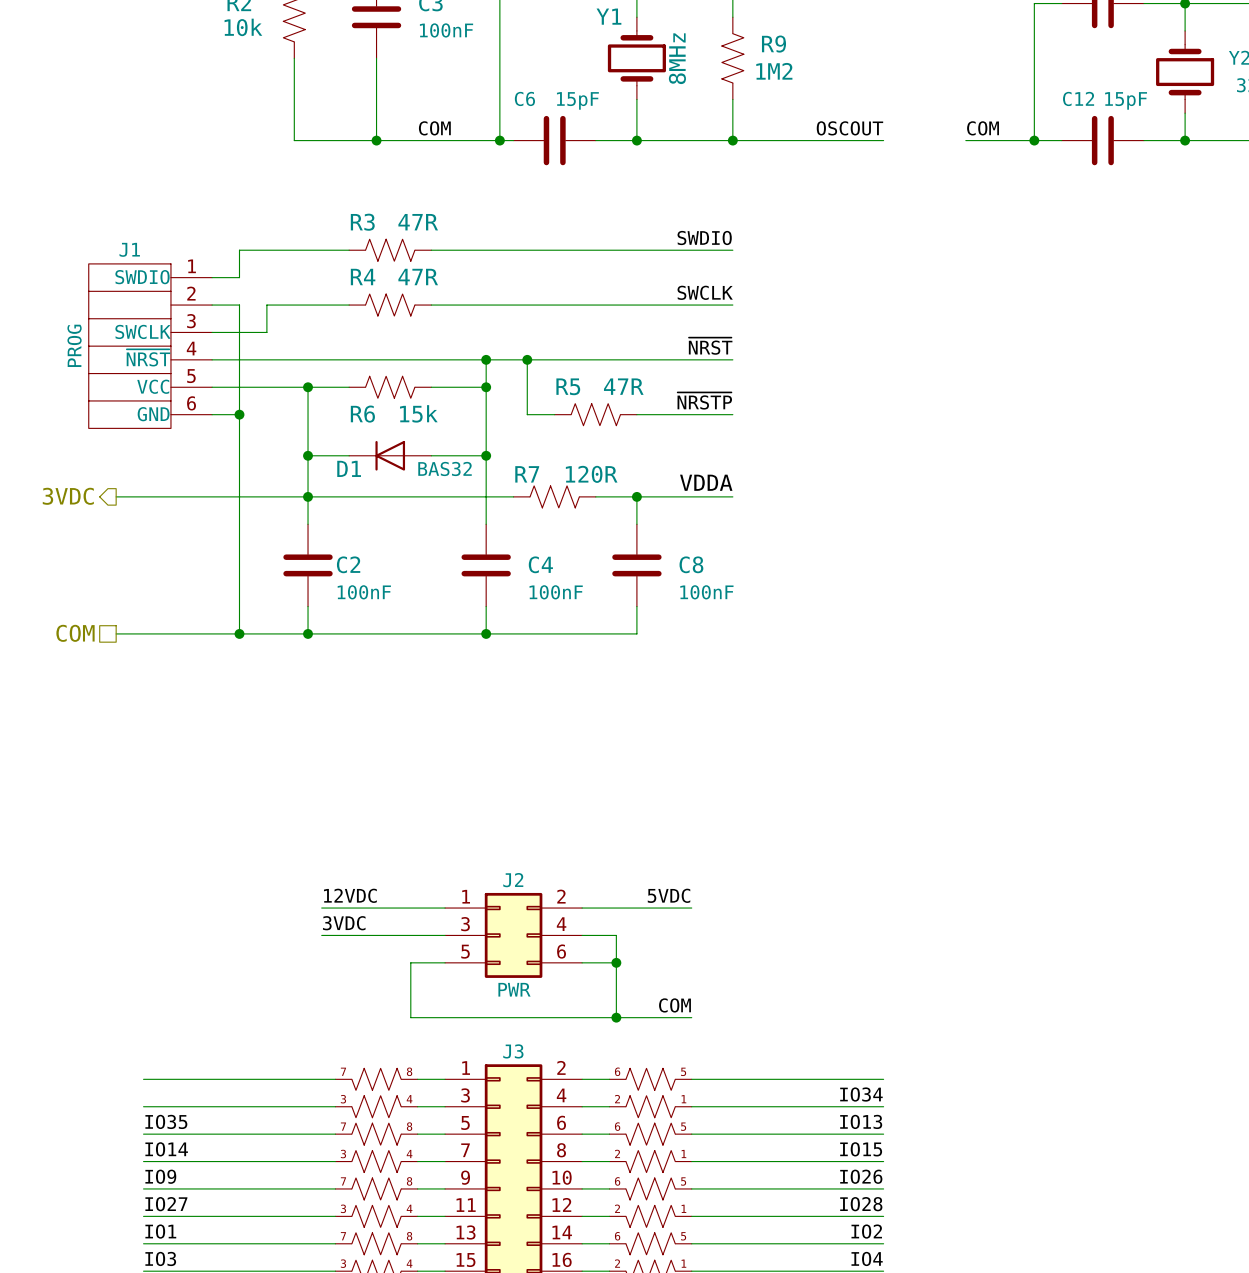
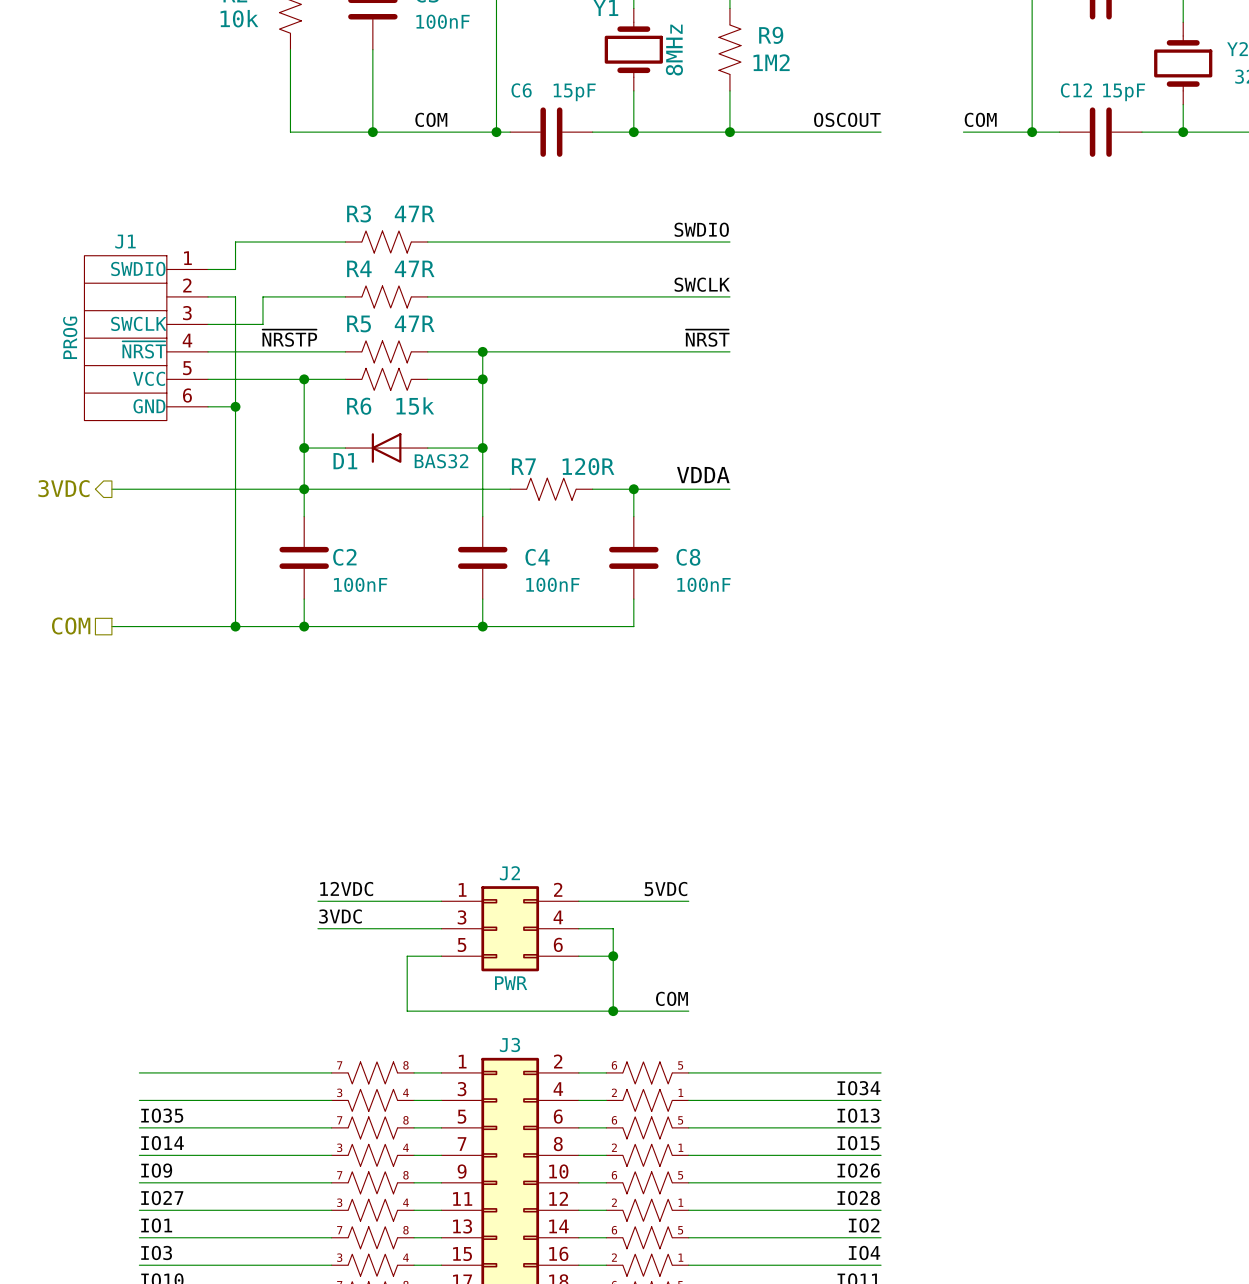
label: none -> ~{NRSTP} (289, 338)
wire: (349, 359) (431, 359) -> none
wire: (527, 359) (527, 414) (554, 414) -> none
junction: (527, 359) -> none
label: ~{NRSTP} (704, 401) -> none
R5 position: (595, 414) -> (386, 351)
wire: (636, 414) (732, 414) -> none

